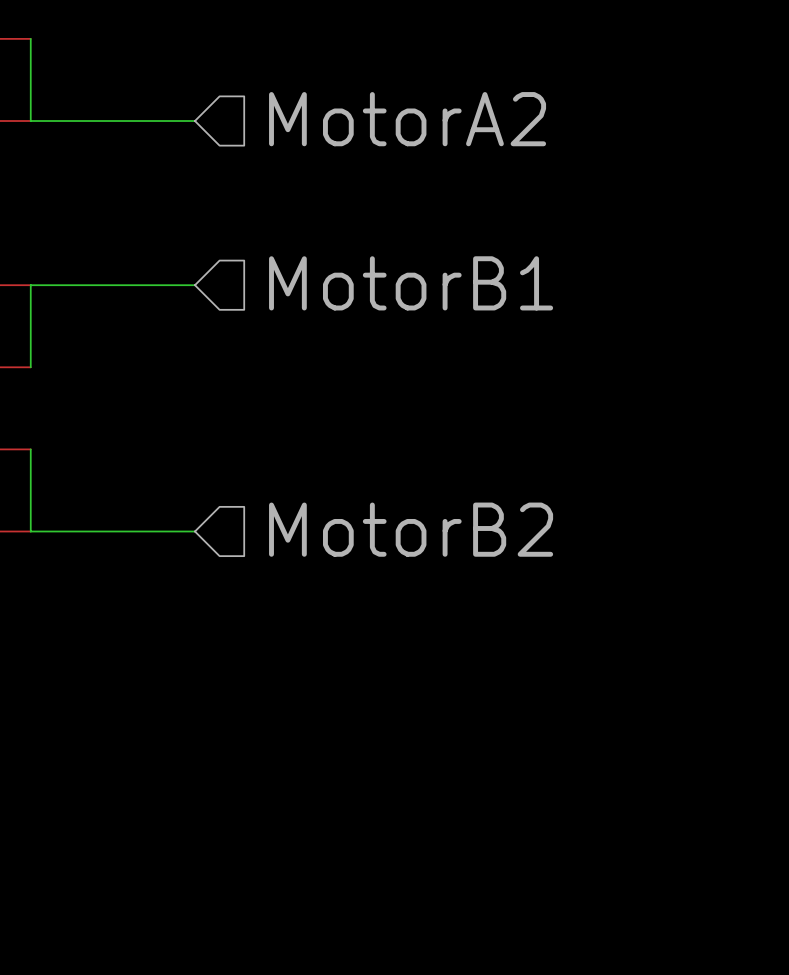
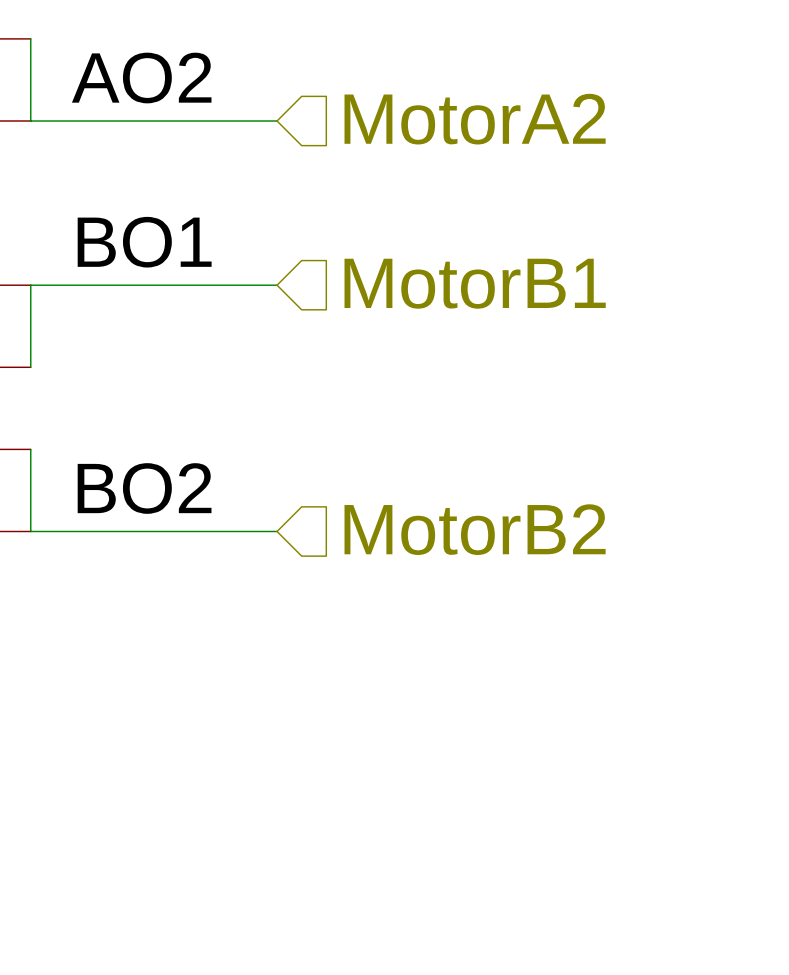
label: none -> AO2 (141, 78)
hierarchical label position: MotorA2 (407, 119) -> MotorA2 (475, 119)
wire: none -> (194, 121) (277, 121)
label: none -> BO1 (144, 242)
hierarchical label position: MotorB1 (411, 283) -> MotorB1 (475, 283)
wire: none -> (194, 285) (277, 285)
label: none -> BO2 (144, 488)
hierarchical label position: MotorB2 (411, 529) -> MotorB2 (475, 529)
wire: none -> (194, 531) (277, 531)

